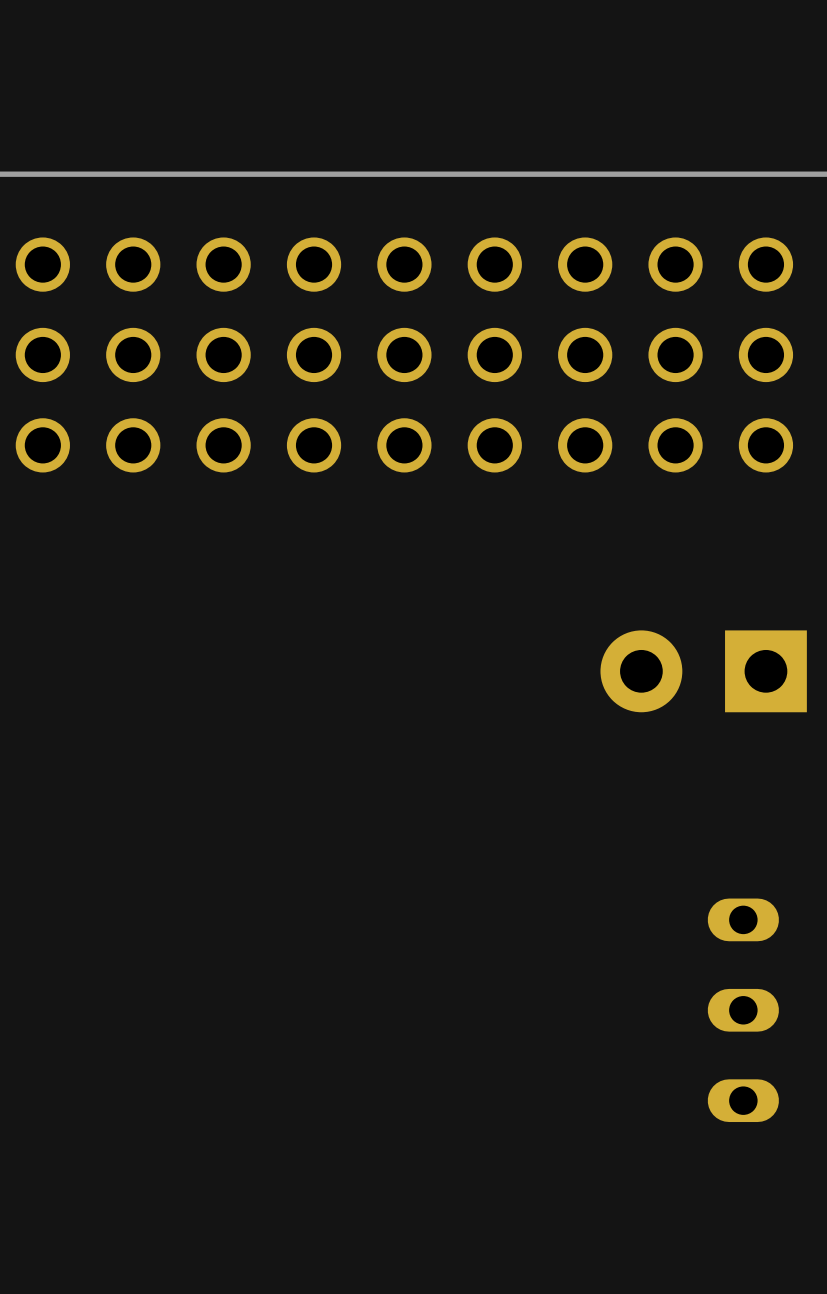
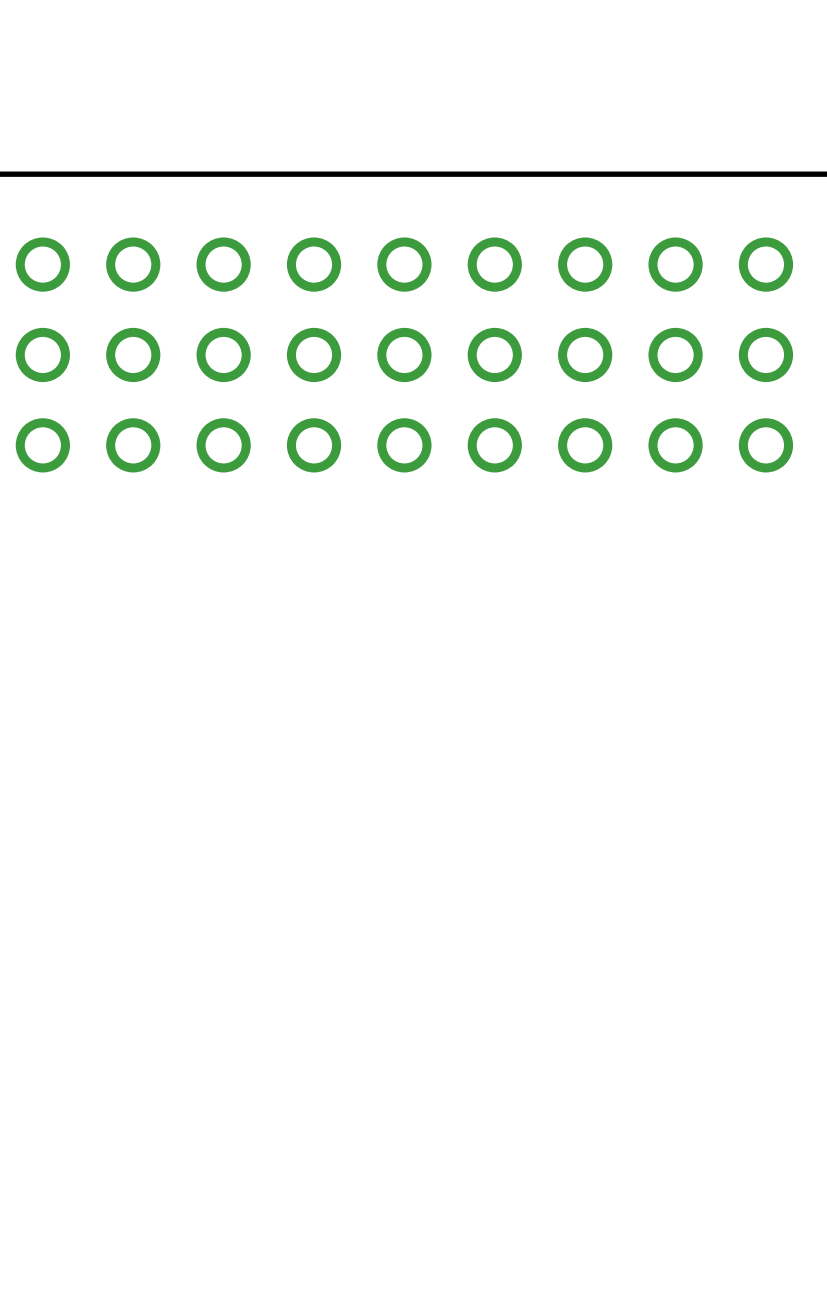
part: (703, 671) -> none
part: (743, 1010) -> none

